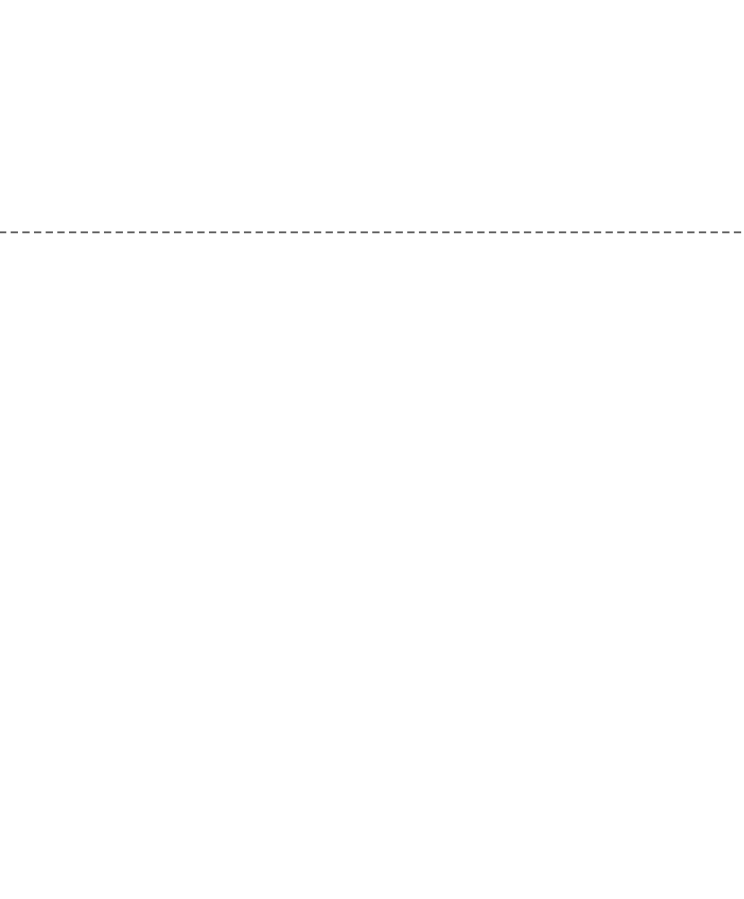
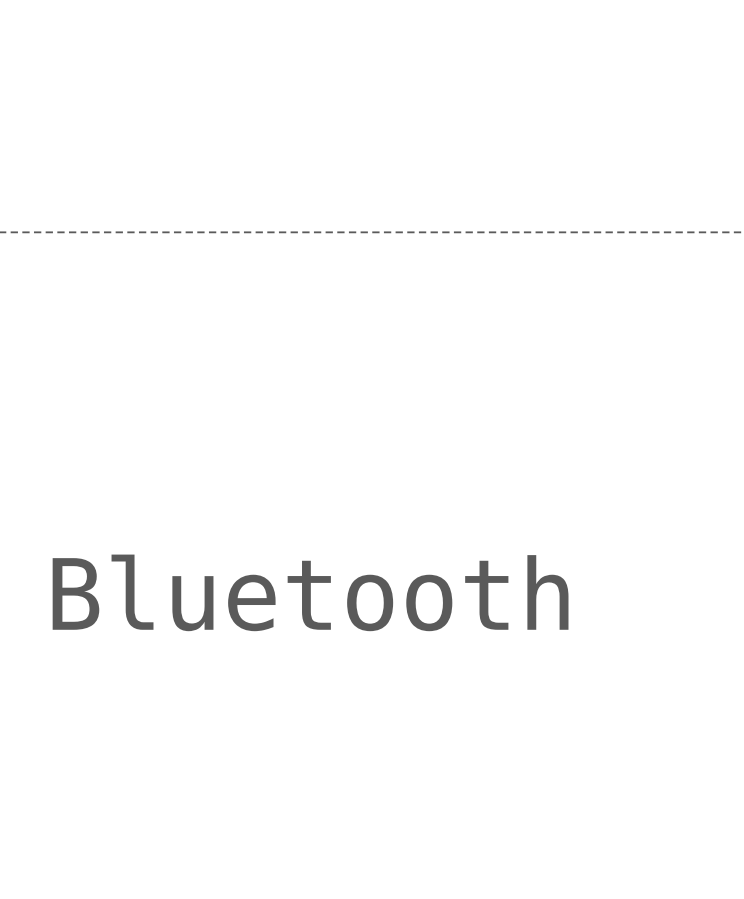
text: none -> Bluetooth (310, 592)

